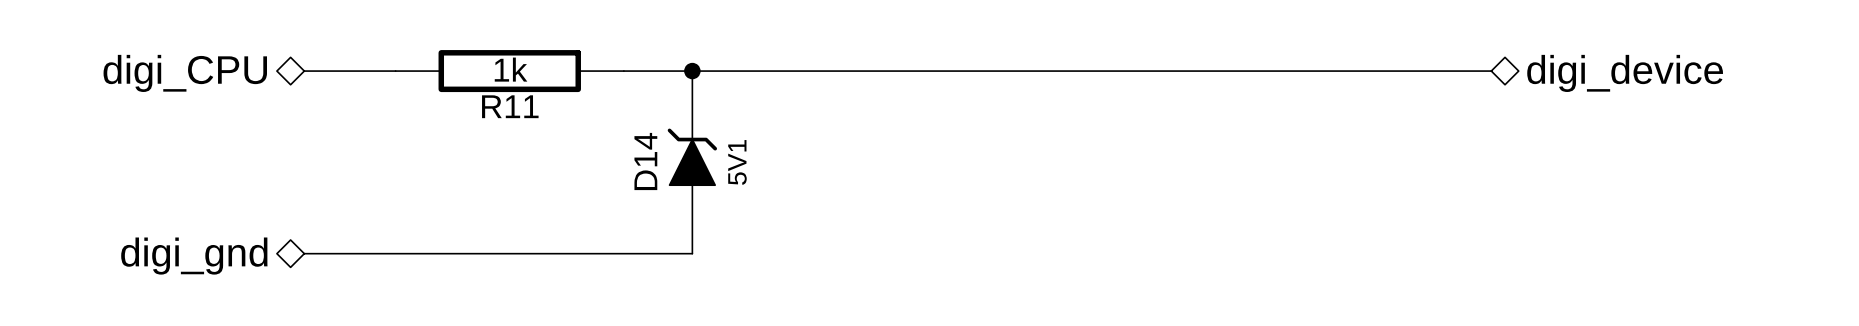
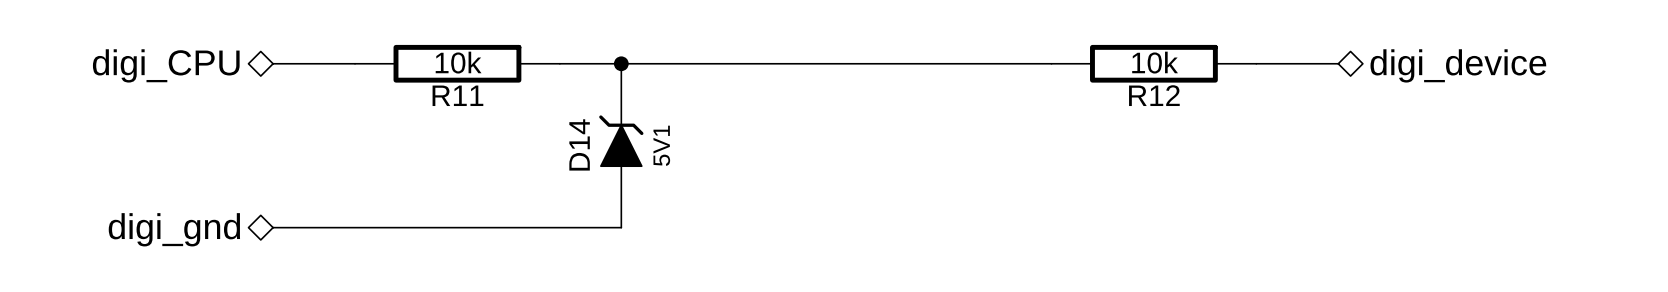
R11 value: 1k (511, 69) -> 10k (458, 62)
wire: (1171, 71) (1400, 71) -> none
R12: none -> 10k (1153, 63)

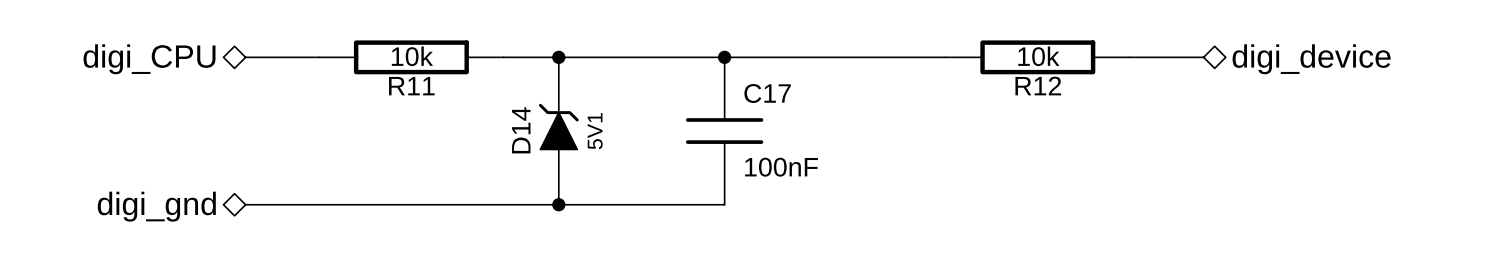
junction: none -> (724, 57)
C17: none -> 100nF (724, 131)
wire: none -> (558, 204) (724, 204)
junction: none -> (558, 204)

